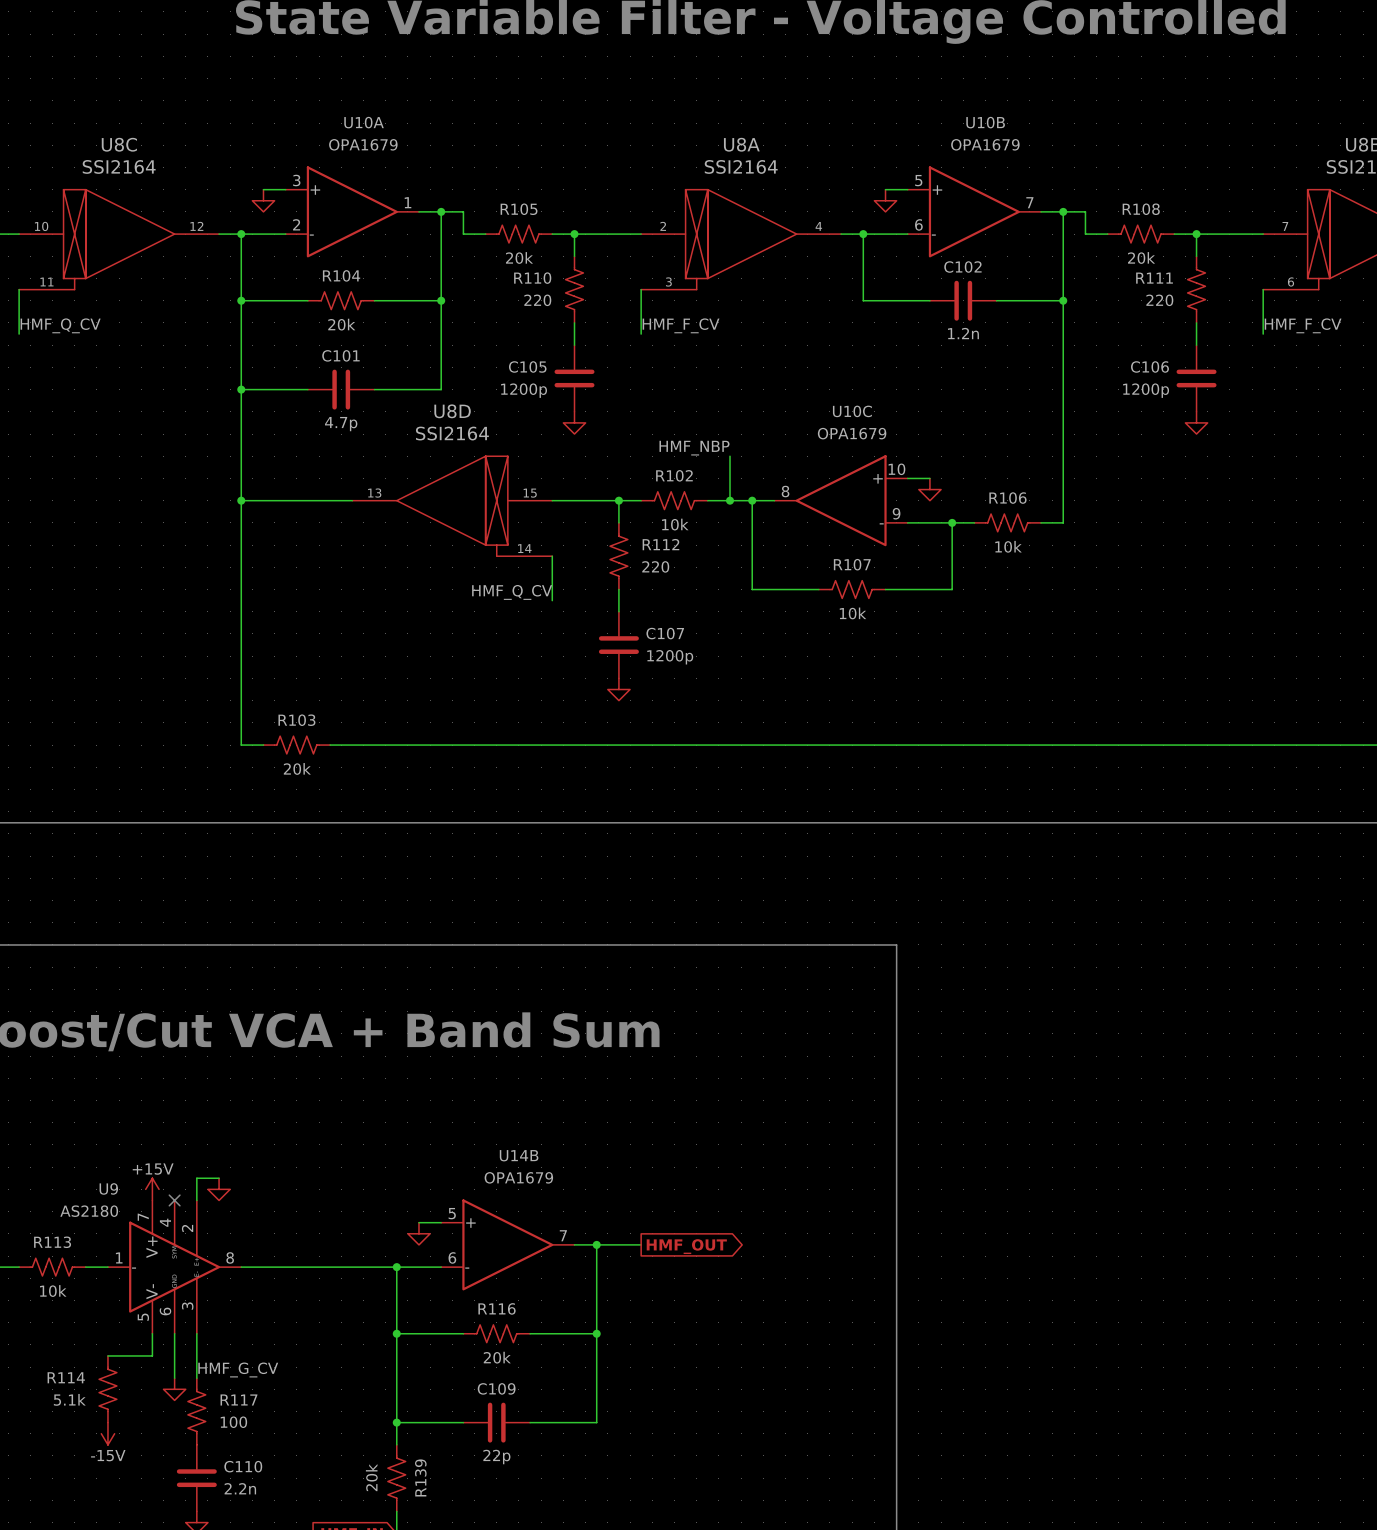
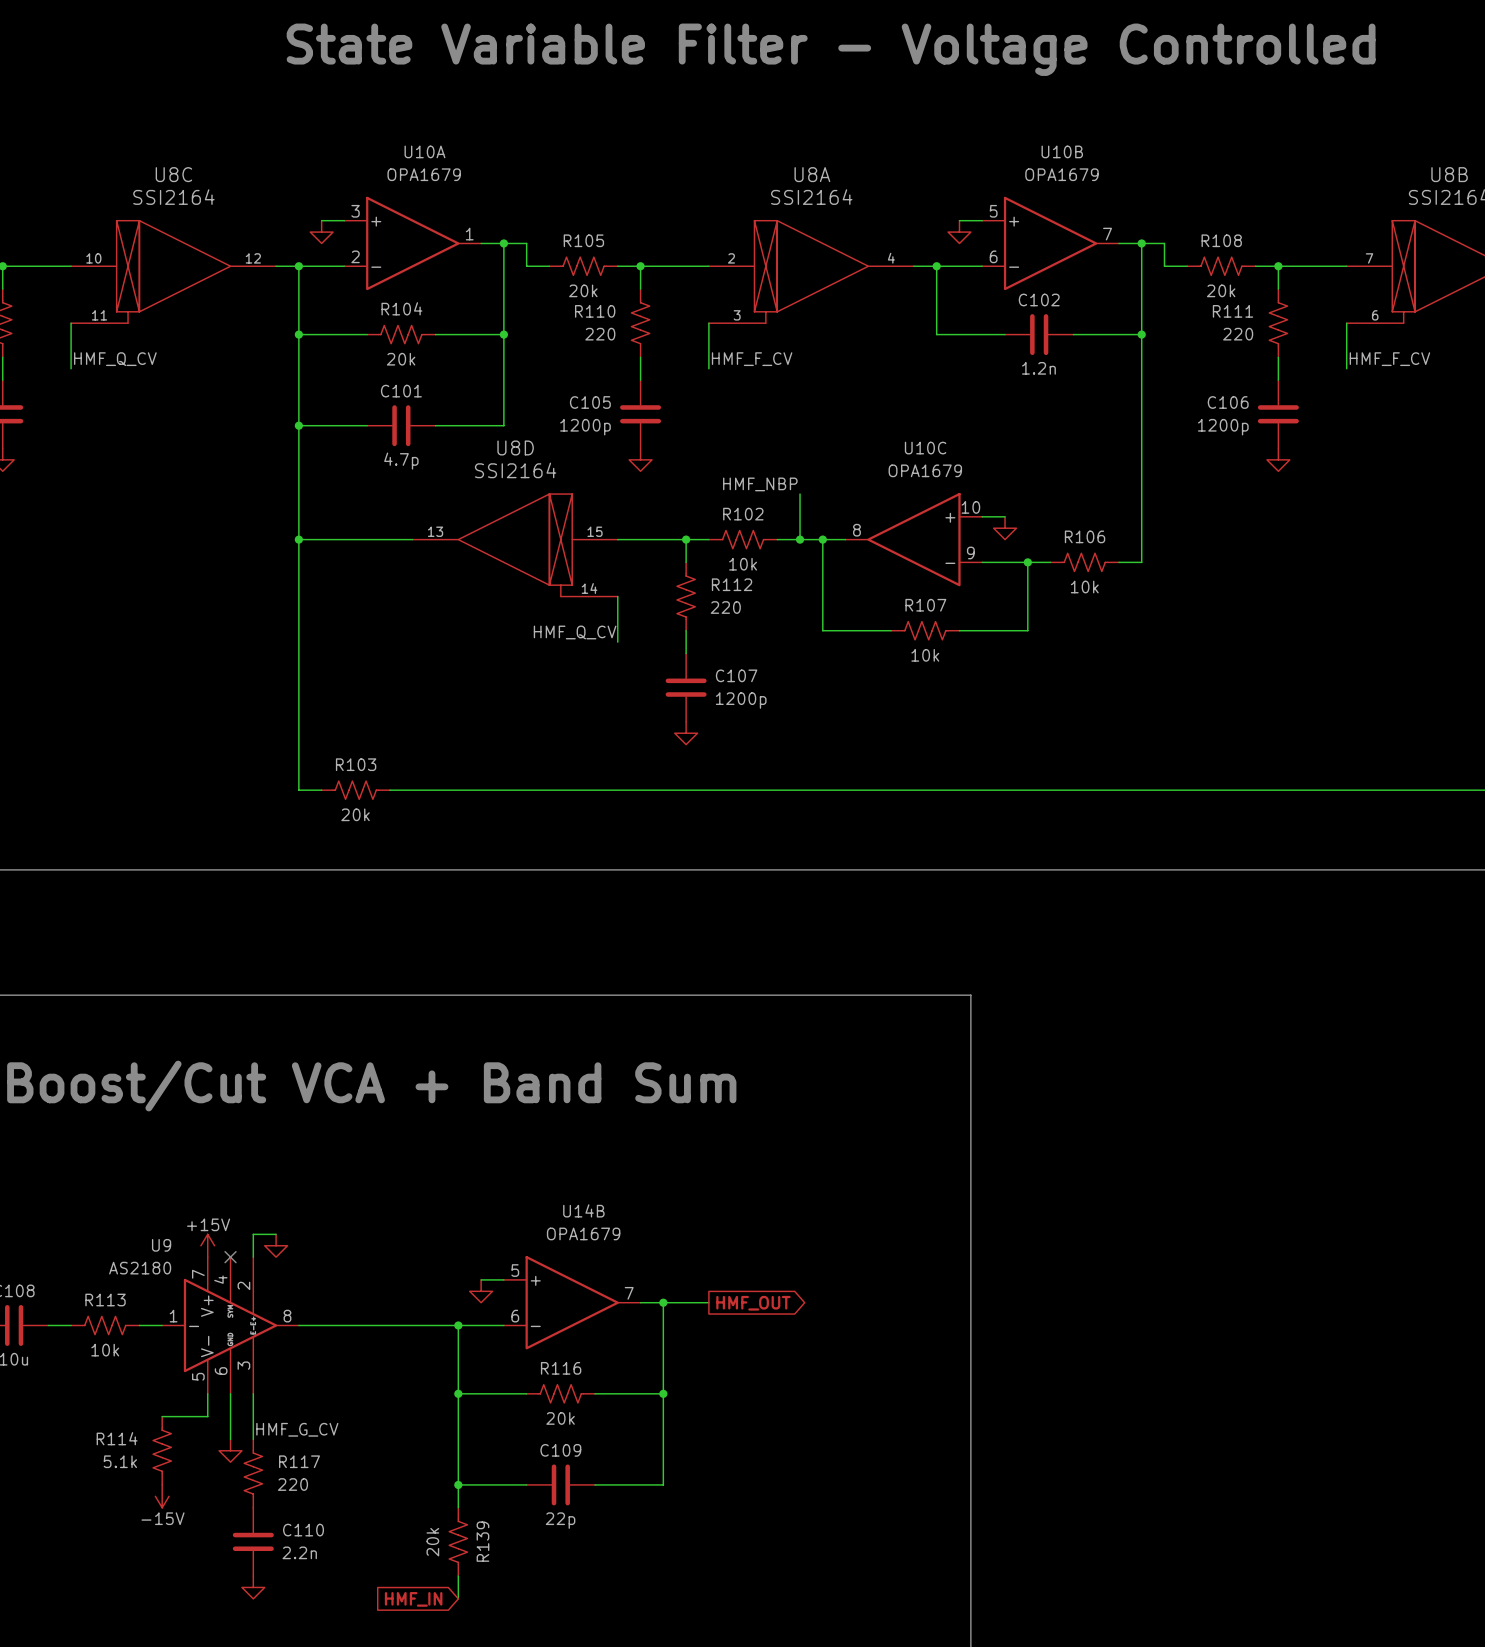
R117 value: 100 (233, 1422) -> 220 (292, 1484)

